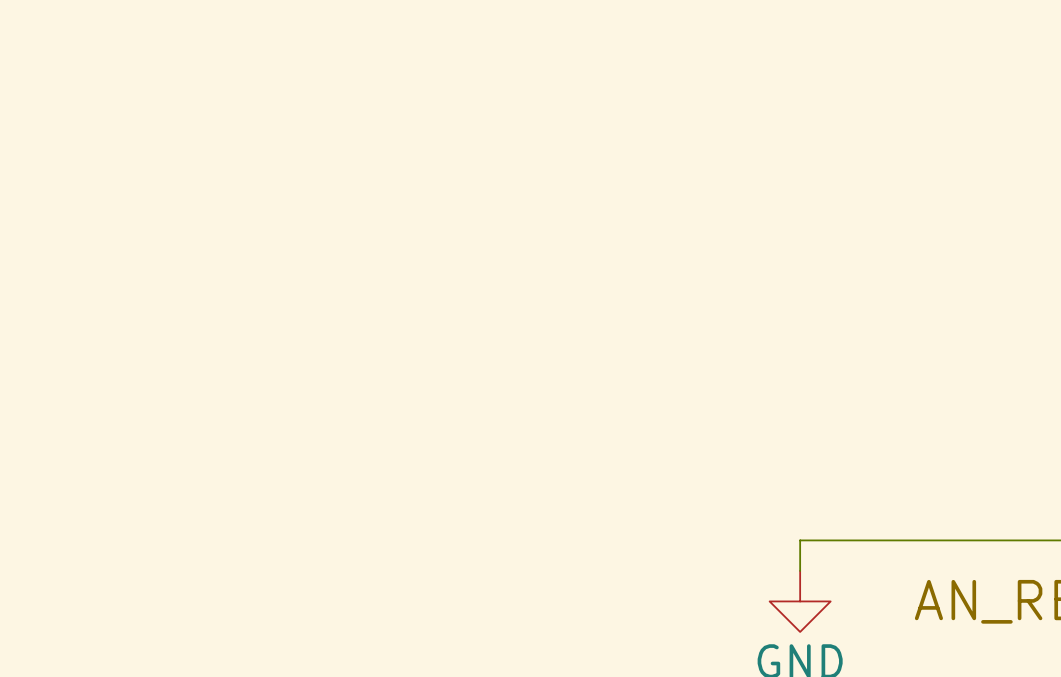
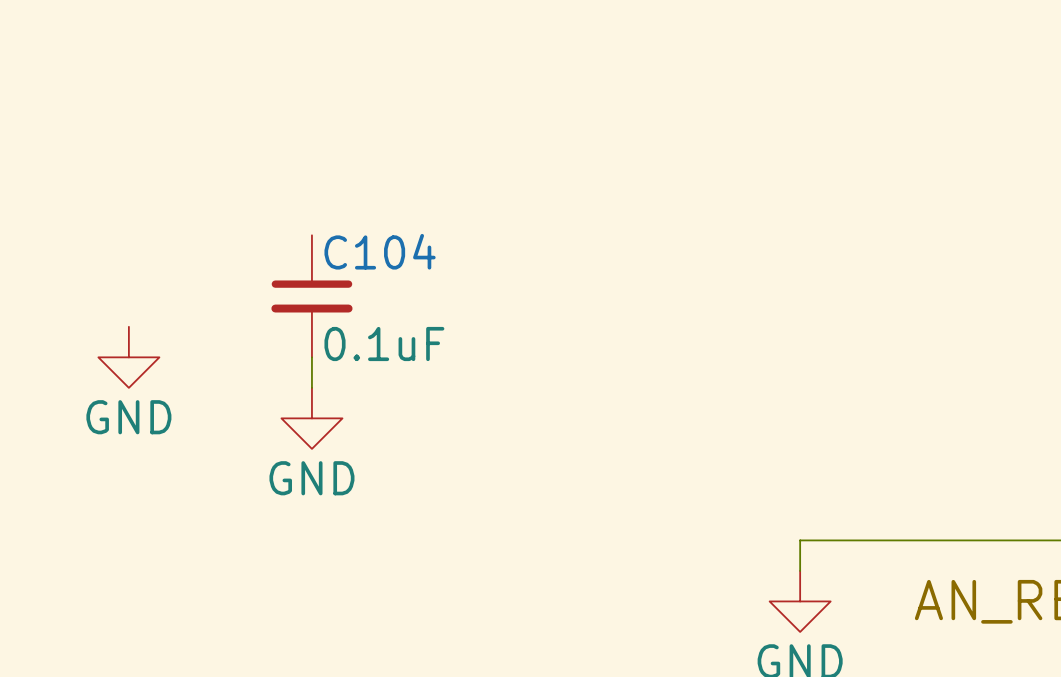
C104: none -> 0.1uF (311, 296)
power symbol: none -> GND (128, 357)
wire: none -> (311, 357) (311, 387)
power symbol: none -> GND (311, 418)

